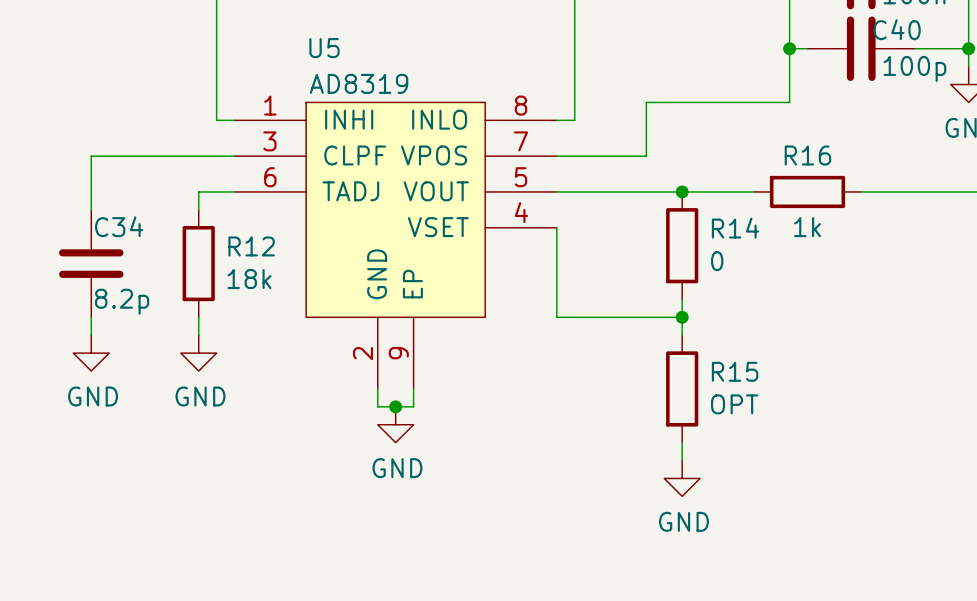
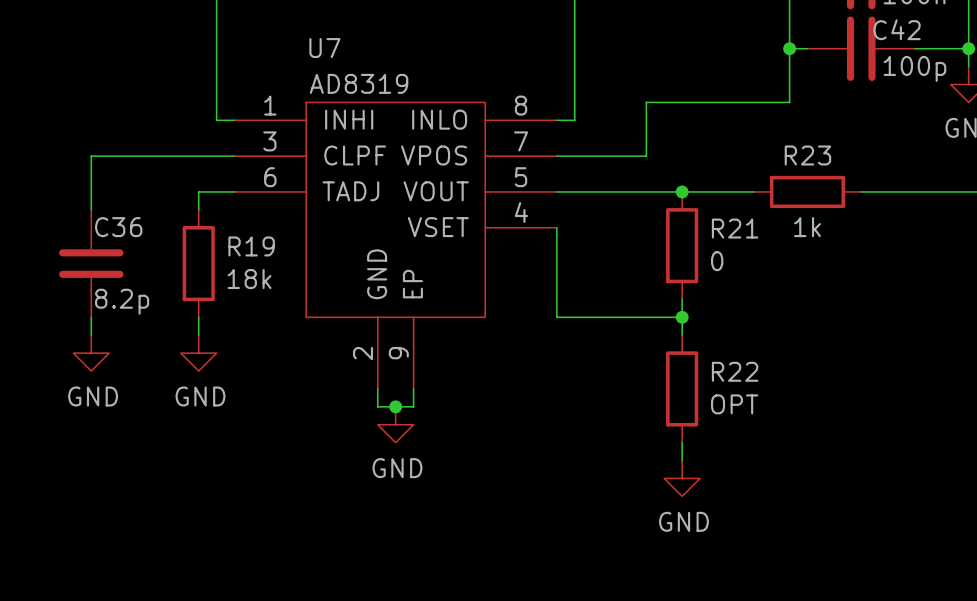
C40 name: C40 (897, 29) -> C42 (897, 29)
U5 name: U5 (324, 48) -> U7 (324, 48)
R16 name: R16 (807, 155) -> R23 (807, 155)
C34 name: C34 (119, 226) -> C36 (118, 227)
R14 name: R14 (735, 228) -> R21 (735, 228)
R12 name: R12 (251, 246) -> R19 (251, 246)
R15 name: R15 (735, 371) -> R22 (735, 371)

